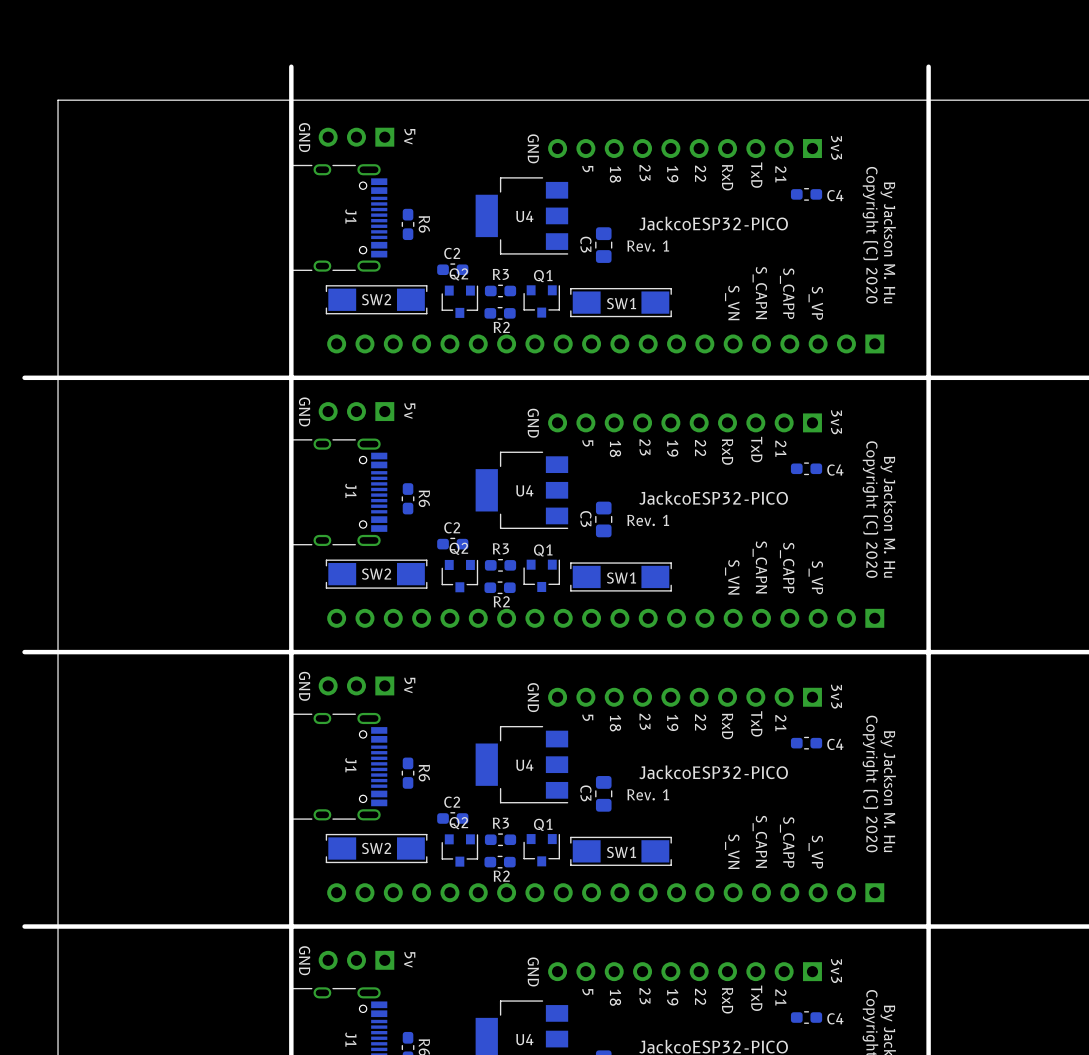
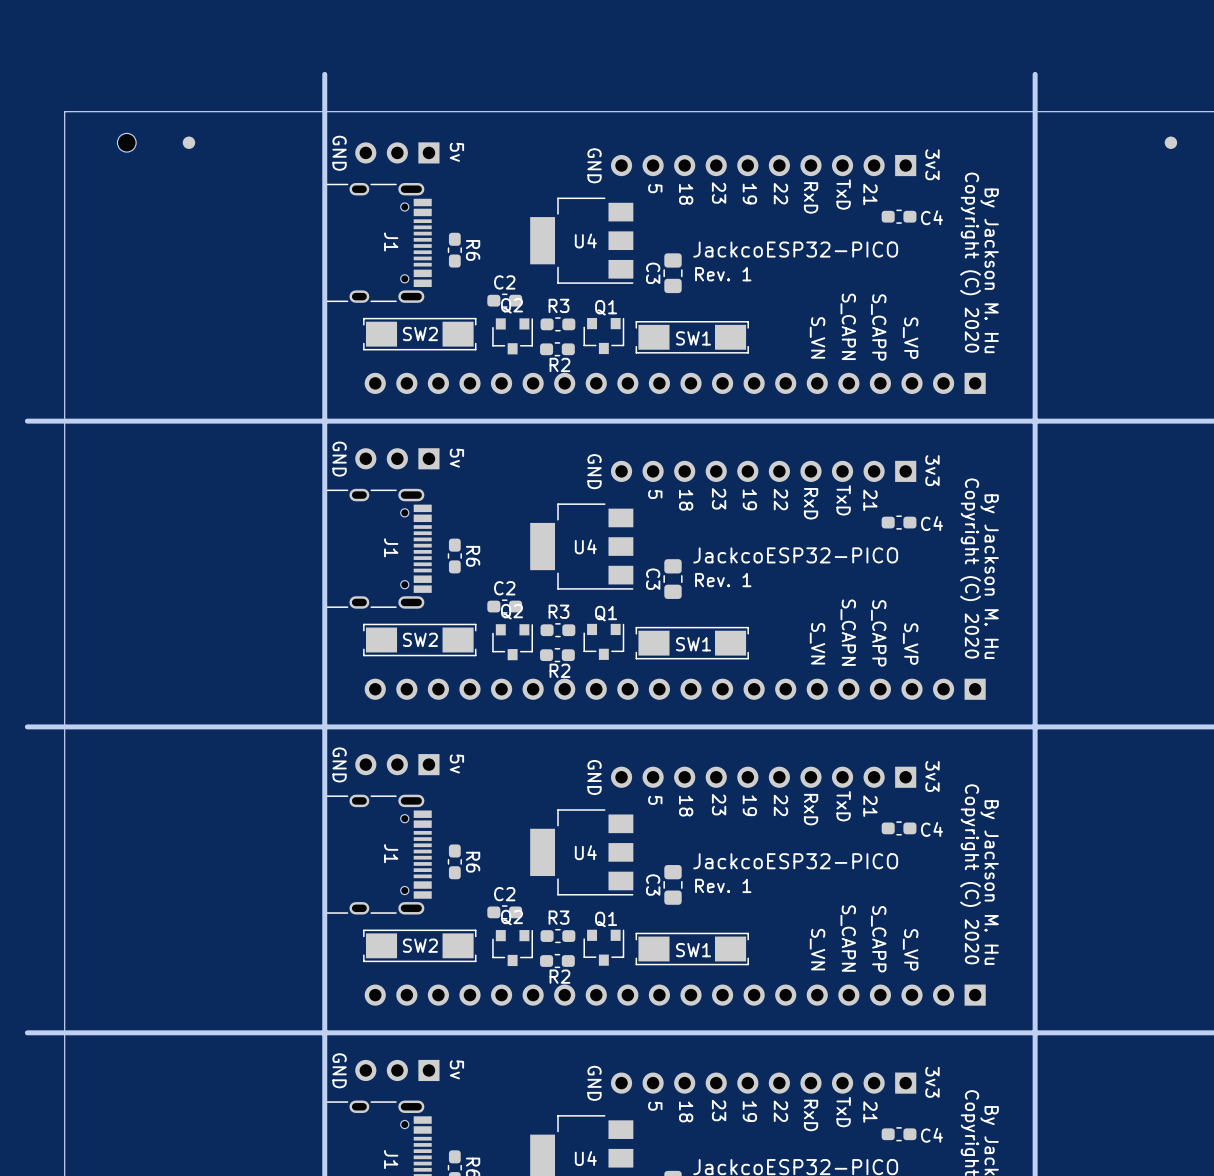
part: none -> (126, 142)
part: none -> (188, 142)
part: none -> (1170, 142)

